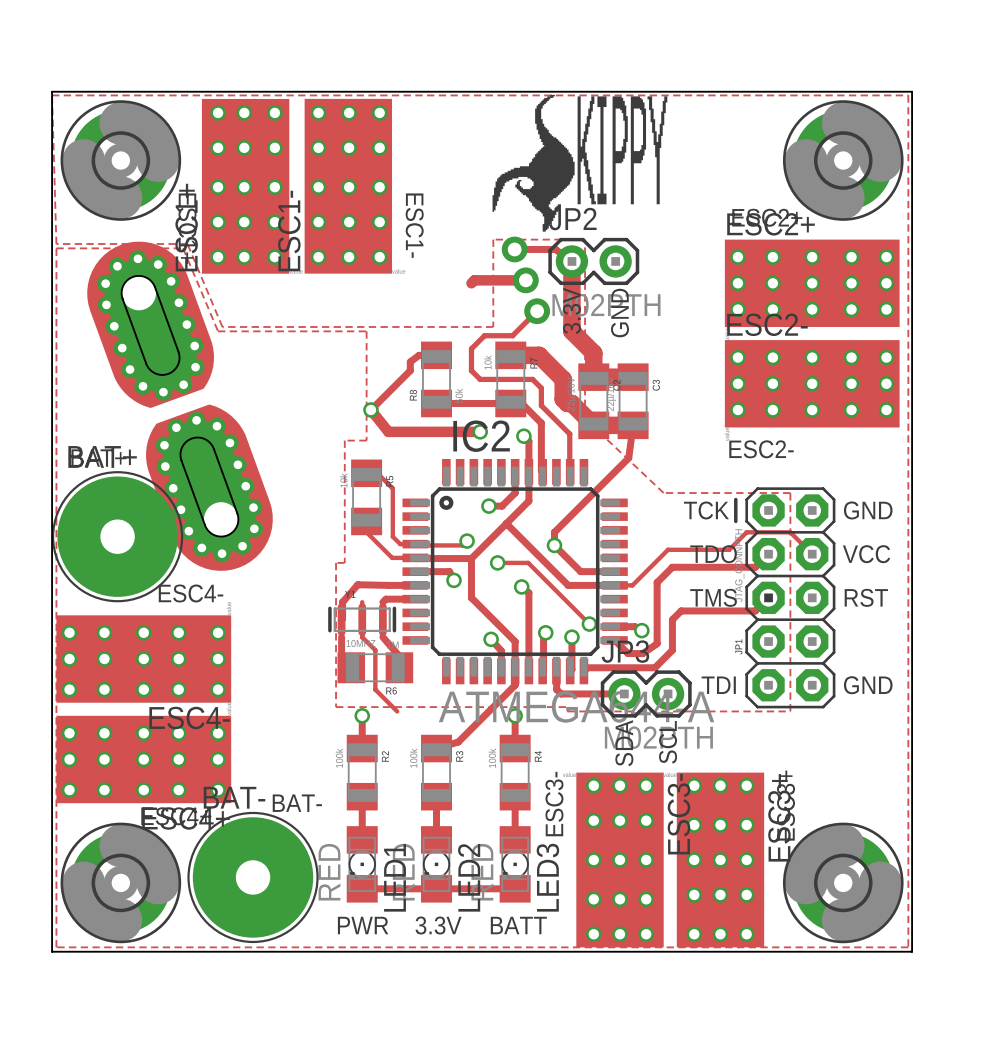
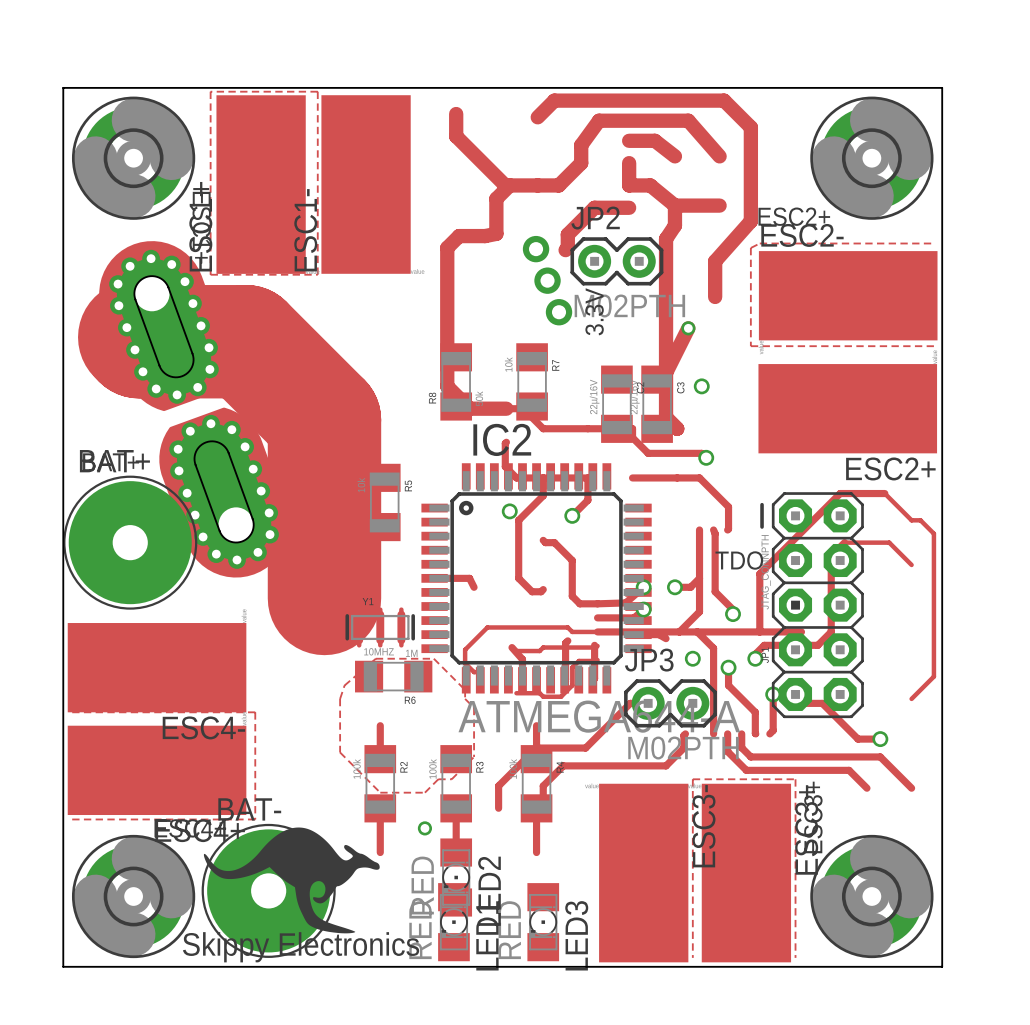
drawing: [492, 94, 668, 232] -> none
zone outline: (196, 95) (52, 95) (56, 243) (187, 243) (222, 326) (493, 326) (493, 239) (585, 239) (585, 418) (663, 493) (790, 493) (790, 711) (567, 711) (567, 707) (336, 707) (336, 562) (344, 562) (344, 440) (366, 440) (366, 331) (218, 331) (183, 248) (56, 248) (56, 947) (908, 947) (908, 95) (301, 95) -> (210, 91) (210, 274) (317, 274) (317, 91)
via: (218, 112) -> none
via: (244, 112) -> none
via: (274, 112) -> none
via: (318, 112) -> none
via: (349, 112) -> none
via: (379, 112) -> none
track: none -> (456, 114) (456, 136) (505, 185) (558, 185) (581, 163) (581, 145) (599, 120) (688, 120) (719, 156)
track: none -> (537, 117) (554, 100) (724, 100) (750, 127) (750, 221) (715, 261) (715, 296)
track: none -> (629, 140) (654, 140) (674, 156)
via: (218, 147) -> none
via: (244, 147) -> none
via: (274, 147) -> none
via: (318, 147) -> none
via: (349, 147) -> none
via: (379, 147) -> none
track: none -> (629, 163) (629, 185) (650, 185) (674, 205)
via: (218, 187) -> none
via: (244, 187) -> none
via: (274, 187) -> none
via: (318, 187) -> none
via: (349, 187) -> none
via: (379, 187) -> none
track: none -> (509, 185) (496, 198) (496, 233) (485, 236) (459, 236) (447, 247) (447, 386) (469, 408) (523, 408) (543, 428) (632, 428) (632, 437) (648, 453) (701, 453) (706, 457)
track: none -> (674, 205) (719, 205)
track: none -> (674, 205) (674, 225) (666, 239) (666, 417)
track: none -> (629, 207) (594, 207) (567, 234) (567, 247) (565, 250)
via: (218, 222) -> none
via: (244, 222) -> none
via: (274, 222) -> none
via: (318, 222) -> none
via: (349, 222) -> none
via: (379, 222) -> none
text: ESC1- (414, 225) -> none
zone outline: none -> (933, 243) (759, 243) (750, 247) (750, 346) (933, 346)
track: (514, 249) (555, 249) (571, 261) (571, 331) (593, 353) (593, 377) (633, 377) -> none
via: (218, 257) -> none
via: (244, 257) -> none
via: (274, 257) -> none
via: (318, 257) -> none
via: (349, 257) -> none
via: (379, 257) -> none
via: (737, 257) -> none
via: (772, 257) -> none
via: (812, 257) -> none
via: (851, 257) -> none
via: (886, 257) -> none
track: (525, 280) (474, 280) (471, 283) -> none
via: (737, 283) -> none
via: (772, 283) -> none
ESC2+ rotation: 0° (812, 283) -> 180° (847, 408)
ESC2+ position: (812, 283) -> (847, 408)
via: (812, 283) -> none
via: (851, 283) -> none
via: (886, 283) -> none
via: (737, 309) -> none
via: (772, 309) -> none
via: (812, 309) -> none
via: (851, 309) -> none
via: (886, 309) -> none
track: (537, 311) (512, 335) (484, 335) (471, 348) (471, 370) (480, 379) (532, 379) (541, 388) (541, 405) (569, 434) (570, 471) -> none
text: GND (620, 313) -> none
track: none -> (688, 328) (666, 372)
via: none -> (688, 328)
track: none -> (134, 337) (139, 341) (246, 341) (324, 419) (324, 598)
track: (436, 355) (419, 355) (410, 361) (410, 370) (370, 410) (388, 431) (480, 431) -> none
track: (510, 355) (539, 355) (563, 379) (563, 399) (567, 403) (571, 403) (593, 425) (633, 425) (628, 458) (554, 532) (554, 545) (580, 571) (614, 571) -> none
via: (737, 357) -> none
via: (772, 357) -> none
via: (812, 357) -> none
via: (851, 357) -> none
via: (886, 357) -> none
via: none -> (701, 386)
via: (737, 383) -> none
via: (772, 383) -> none
ESC2- position: (812, 383) -> (848, 295)
via: (812, 383) -> none
via: (851, 383) -> none
via: (886, 383) -> none
track: (436, 403) (521, 403) (541, 423) (542, 471) -> none
via: (370, 410) -> none
via: (737, 410) -> none
via: (772, 410) -> none
via: (812, 410) -> none
via: (851, 410) -> none
via: (886, 410) -> none
via: (480, 431) -> none
track: (523, 436) (528, 441) (528, 501) (471, 558) -> none
via: (523, 436) -> none
track: none -> (506, 442) (505, 466) (516, 477) (587, 477) (587, 500) (572, 515)
text: ESC2- (761, 449) -> none
via: none -> (706, 457)
track: (515, 471) (515, 493) (502, 506) (488, 506) -> none
track: (366, 473) (368, 475) (379, 475) (392, 488) (392, 536) (400, 544) (462, 545) (467, 541) -> none
track: none -> (543, 477) (543, 495) (518, 520) (518, 578) (532, 591) (541, 591) (543, 589)
track: none -> (632, 477) (699, 477) (728, 506) (727, 529)
text: TCK (706, 510) -> none
text: GND (868, 510) -> none
track: (366, 521) (366, 532) (392, 557) (471, 558) -> none
track: (506, 523) (568, 585) (632, 585) (668, 549) (729, 549) (746, 532) (790, 532) (812, 554) -> none
track: none -> (699, 529) (699, 611) (679, 631)
track: none -> (713, 529) (715, 591) (733, 609) (733, 614)
track: none -> (543, 540) (545, 542) (554, 542) (572, 560) (572, 596) (579, 603) (625, 602) (643, 587)
via: (467, 541) -> none
via position: (554, 545) -> (572, 515)
track: (768, 554) (755, 567) (672, 567) (657, 582) (657, 643) (642, 653) (628, 653) (614, 640) -> none
text: VCC (866, 554) -> none
track: (471, 558) (471, 597) (515, 641) (515, 685) (458, 742) (436, 748) -> none
track: none -> (911, 564) (889, 542) (844, 542) (831, 556) (831, 631) (817, 645) (764, 645) (755, 654) (755, 658)
track: (497, 562) (528, 562) (589, 624) -> none
via: (497, 562) -> none
track: none -> (699, 578) (690, 587) (674, 587)
via: (453, 580) -> none
via: none -> (643, 587)
via: none -> (674, 587)
track: (415, 585) (357, 584) (342, 602) (341, 619) -> none
track: (521, 586) (528, 592) (528, 671) -> none
via: (521, 586) -> none
text: ESC4- (191, 593) -> none
text: TMS (713, 597) -> none
track: (768, 597) (755, 610) (681, 610) (672, 619) (672, 650) (654, 667) (585, 667) (583, 671) -> none
text: RST (866, 597) -> none
track: (415, 599) (385, 599) (382, 602) -> none
track: none -> (643, 609) (634, 617) (597, 617)
via: none -> (643, 609)
via: none -> (733, 614)
track: (362, 619) (362, 637) (375, 650) (375, 689) (397, 711) -> none
via: (589, 624) -> none
track: none -> (697, 631) (713, 648) (713, 733)
track: none -> (759, 631) (759, 573) (840, 493) (884, 493) (911, 520) (920, 520) (933, 533) (933, 676) (911, 698)
track: none -> (801, 631) (572, 631) (567, 627) (487, 627) (465, 649) (465, 663) (474, 672) (480, 672)
via: (641, 630) -> none
via: (69, 632) -> none
via: (104, 632) -> none
via: (143, 632) -> none
via: (178, 632) -> none
via: (218, 632) -> none
via: (545, 632) -> none
track: (341, 637) (341, 655) (351, 667) -> none
track: (382, 637) (404, 662) (399, 667) -> none
via: (571, 637) -> none
track: none -> (597, 646) (543, 647) (539, 651) (516, 651)
via: (491, 639) -> none
zone outline: none -> (375, 658) (344, 685) (340, 698) (340, 752) (380, 792) (424, 792) (438, 779) (451, 779) (474, 756) (474, 707) (465, 698) (465, 689) (433, 658) (375, 658)
via: none -> (692, 658)
via: none -> (755, 658)
track: none -> (597, 660) (578, 660) (572, 667) (572, 685) (561, 696) (543, 696) (539, 693) (516, 693)
via: (69, 659) -> none
via: (104, 659) -> none
via: (143, 659) -> none
via: (178, 659) -> none
via: (218, 659) -> none
track: none -> (728, 667) (728, 685) (755, 712) (755, 733)
via: none -> (728, 667)
track: (556, 671) (556, 689) (561, 693) (606, 693) -> (498, 808) (498, 785) (536, 748) (585, 748) (630, 703)
text: TDI (718, 685) -> none
track: none -> (773, 694) (773, 730) (769, 733)
via: none -> (773, 694)
text: GND (868, 685) -> none
via: (69, 689) -> none
via: (104, 689) -> none
via: (143, 689) -> none
via: (178, 689) -> none
via: (218, 689) -> none
track: none -> (801, 702) (822, 703) (858, 739) (880, 739)
zone outline: none -> (72, 712) (255, 712) (255, 819) (72, 819)
via: (362, 715) -> none
via: (515, 715) -> none
track: none -> (685, 733) (683, 748) (666, 765) (563, 765) (543, 785) (543, 808)
track: none -> (727, 733) (727, 751) (746, 770) (849, 770) (866, 788)
track: none -> (741, 733) (741, 747) (750, 756) (880, 756) (911, 788)
via: none -> (880, 739)
via: (69, 733) -> none
via: (104, 733) -> none
via: (143, 733) -> none
via: (178, 733) -> none
via: (218, 733) -> none
text: SCL (668, 742) -> none
text: SDA (624, 743) -> none
via: (69, 759) -> none
via: (104, 759) -> none
via: (143, 759) -> none
via: (178, 759) -> none
via: (218, 759) -> none
via: (593, 785) -> none
via: (620, 785) -> none
via: (646, 785) -> none
via: (694, 785) -> none
via: (720, 785) -> none
via: (746, 785) -> none
via: (69, 790) -> none
via: (104, 790) -> none
via: (143, 790) -> none
via: (178, 790) -> none
via: (218, 790) -> none
text: BAT- (297, 803) -> none
text: ESC3- (554, 804) -> none
drawing: none -> [203, 827, 380, 934]
via: none -> (424, 828)
via: (593, 820) -> none
via: (620, 820) -> none
via: (646, 820) -> none
via: (694, 825) -> none
via: (720, 825) -> none
via: (746, 825) -> none
via: (593, 859) -> none
via: (620, 859) -> none
via: (646, 859) -> none
via: (694, 859) -> none
via: (720, 859) -> none
via: (746, 859) -> none
LED1 position: (362, 864) -> (453, 922)
LED3 position: (515, 864) -> (543, 922)
part rotation: 0° (843, 882) -> 90° clockwise (871, 896)
track: (362, 888) (515, 888) -> none
via: (694, 894) -> none
via: (720, 894) -> none
via: (746, 894) -> none
via: (593, 899) -> none
via: (620, 899) -> none
via: (646, 899) -> none
text: PWR (363, 925) -> none
text: 3.3V (438, 925) -> none
text: BATT (518, 925) -> none
via: (593, 934) -> none
via: (620, 934) -> none
via: (646, 934) -> none
via: (694, 934) -> none
via: (720, 934) -> none
via: (746, 934) -> none
zone outline: none -> (692, 957) (692, 779) (795, 779) (795, 957)

